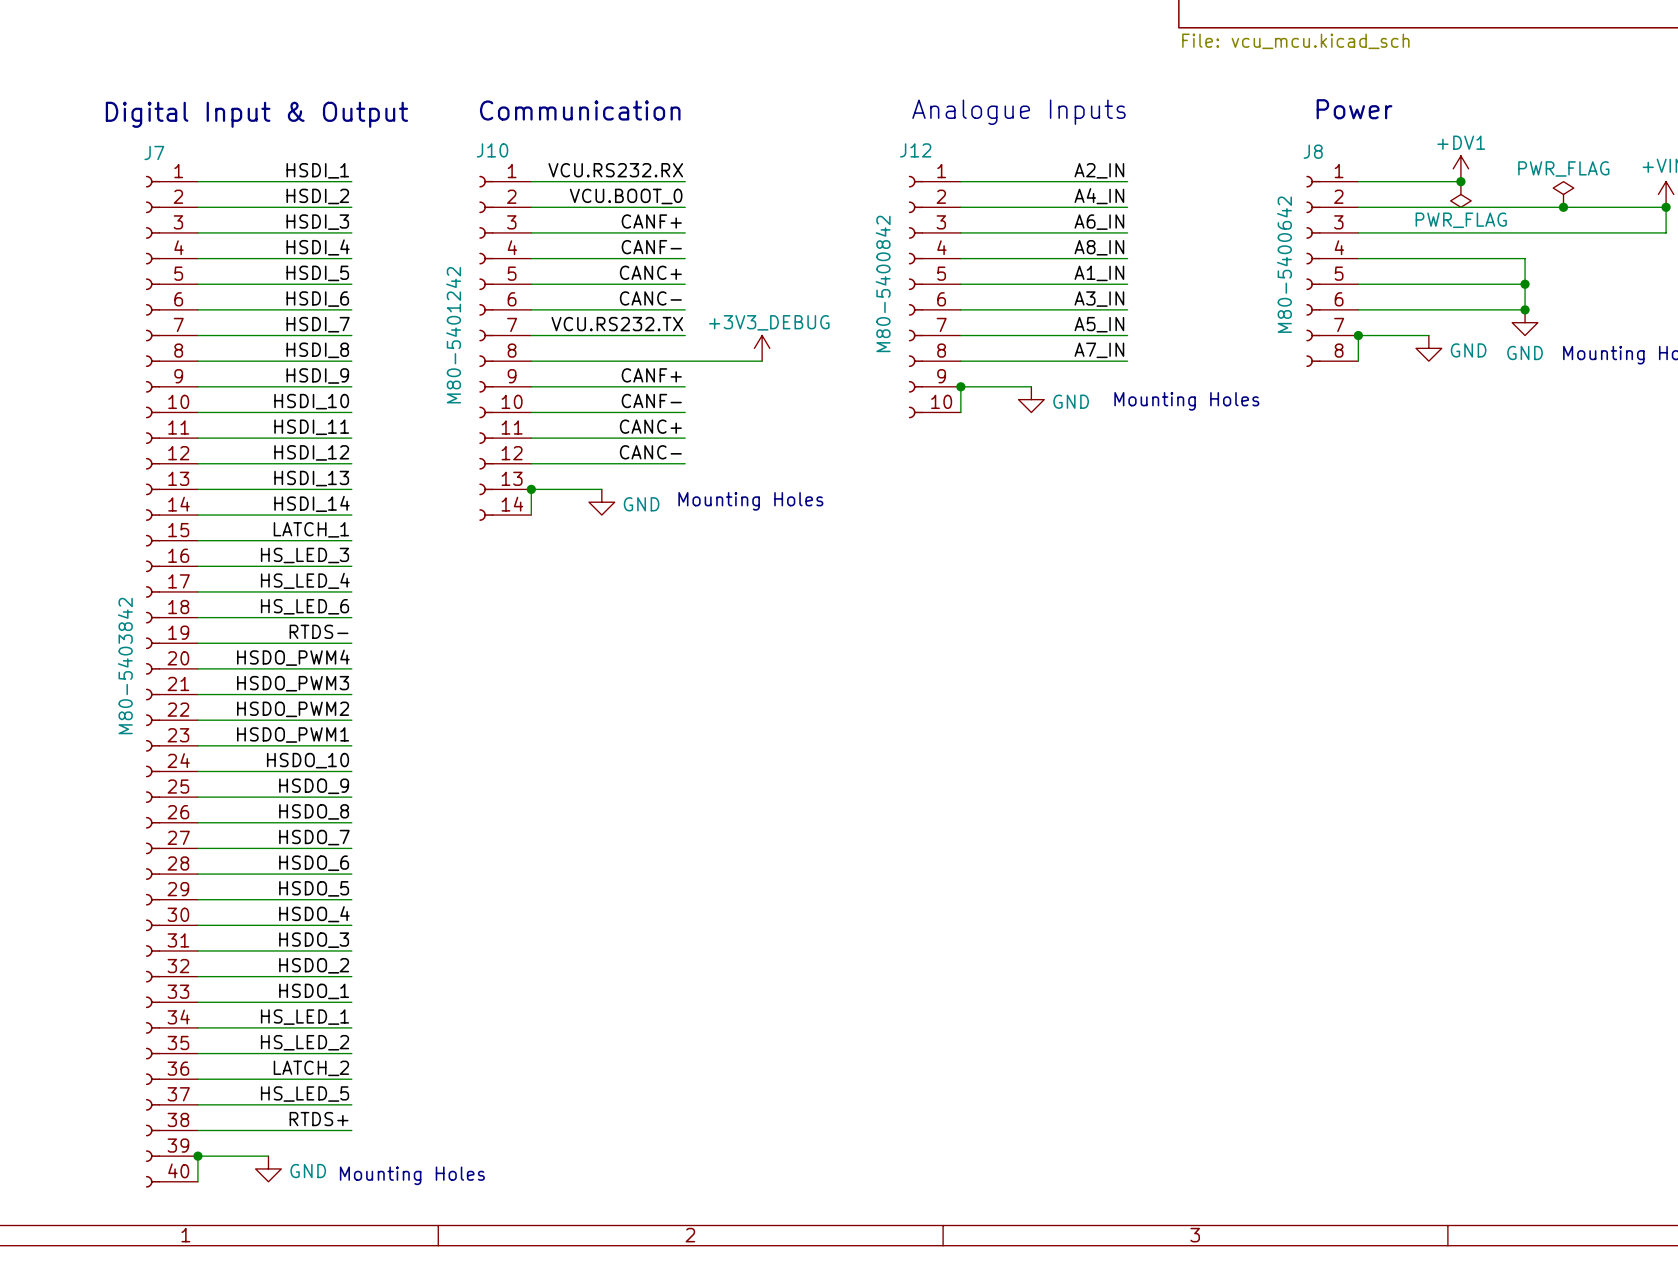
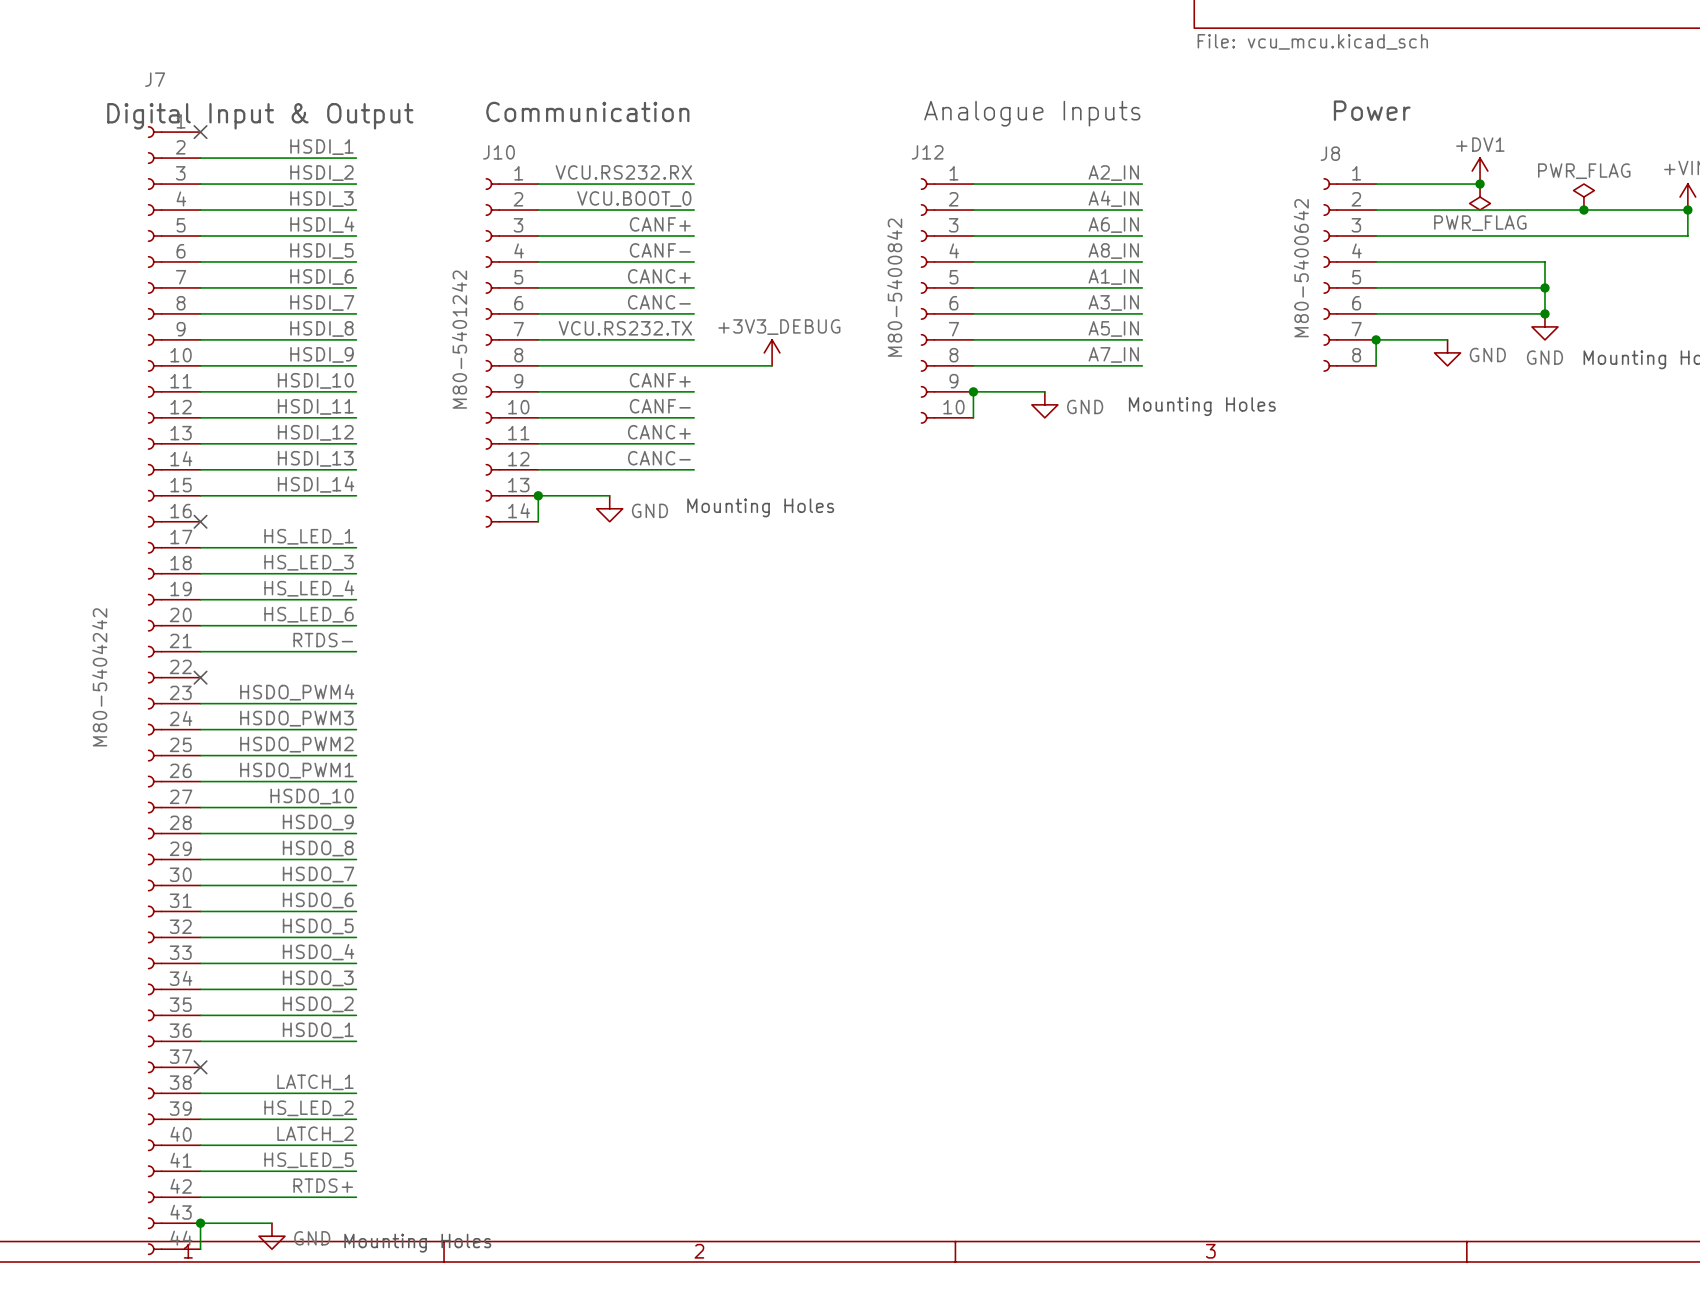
no-connect mark: none -> (200, 132)
label: none -> HSDI_1 (321, 147)
J7 name position: J7 (154, 152) -> J7 (155, 79)
wire: none -> (200, 158) (356, 158)
label: HSDI_1 (317, 170) -> HSDI_2 (321, 173)
J7 symbol: [145, 175, 198, 1188] -> [147, 126, 201, 1256]
label: HSDI_2 (317, 196) -> HSDI_3 (321, 199)
label: HSDI_3 (317, 222) -> HSDI_4 (322, 224)
label: HSDI_4 (318, 247) -> HSDI_5 (321, 251)
label: HSDI_5 (317, 273) -> HSDI_6 (321, 276)
label: HSDI_6 (317, 299) -> HSDI_7 (322, 302)
label: HSDI_7 (318, 324) -> HSDI_8 (321, 328)
label: HSDI_8 (317, 350) -> HSDI_9 (321, 354)
label: HSDI_9 (317, 375) -> HSDI_10 (315, 380)
label: HSDI_10 (311, 401) -> HSDI_11 (315, 406)
label: HSDI_11 (311, 427) -> HSDI_12 (315, 432)
label: HSDI_12 (311, 452) -> HSDI_13 (315, 458)
label: HSDI_13 (311, 478) -> HSDI_14 (316, 484)
label: HSDI_14 (311, 503) -> none
wire: (197, 515) (351, 515) -> none
no-connect mark: none -> (200, 521)
label: LATCH_1 (311, 529) -> HS_LED_1 (308, 536)
label: HSDO_PWM4 (293, 657) -> none
J7 value: M80-5403842 (125, 666) -> M80-5404242 (99, 677)
wire: (197, 668) (351, 668) -> none
no-connect mark: none -> (200, 677)
label: HSDO_PWM3 (293, 683) -> HSDO_PWM4 (297, 692)
label: HSDO_PWM2 (293, 709) -> HSDO_PWM3 (296, 718)
label: HSDO_PWM1 (293, 735) -> HSDO_PWM2 (296, 744)
label: HSDO_10 (308, 760) -> HSDO_PWM1 (296, 770)
label: HSDO_9 (314, 786) -> HSDO_10 (312, 796)
label: HSDO_8 (314, 811) -> HSDO_9 (318, 822)
label: HSDO_7 (314, 837) -> HSDO_8 (318, 848)
label: HSDO_6 (314, 863) -> HSDO_7 (318, 874)
label: HSDO_5 (314, 888) -> HSDO_6 (318, 900)
label: HSDO_4 (314, 914) -> HSDO_5 (318, 926)
label: HSDO_3 (314, 940) -> HSDO_4 (318, 952)
label: HSDO_2 (314, 965) -> HSDO_3 (318, 978)
label: HSDO_1 (314, 991) -> HSDO_2 (318, 1004)
label: HS_LED_1 (305, 1017) -> HSDO_1 (318, 1030)
label: HS_LED_2 (305, 1042) -> none
wire: (197, 1053) (351, 1053) -> none
no-connect mark: none -> (200, 1067)
label: LATCH_2 (311, 1068) -> LATCH_1 (315, 1082)
label: HS_LED_5 (305, 1094) -> HS_LED_2 (308, 1108)
label: RTDS+ (319, 1119) -> LATCH_2 (315, 1134)
label: none -> HS_LED_5 (308, 1160)
wire: (197, 1156) (197, 1181) -> (356, 1197) (200, 1197)
junction position: (197, 1156) -> (200, 1223)
wire: none -> (271, 1171) (356, 1171)
power symbol position: GND (268, 1168) -> GND (271, 1236)
label: none -> RTDS+ (323, 1185)
text position: Mounting Holes (412, 1175) -> Mounting Holes (417, 1243)
wire: none -> (271, 1223) (200, 1223) (200, 1249)

